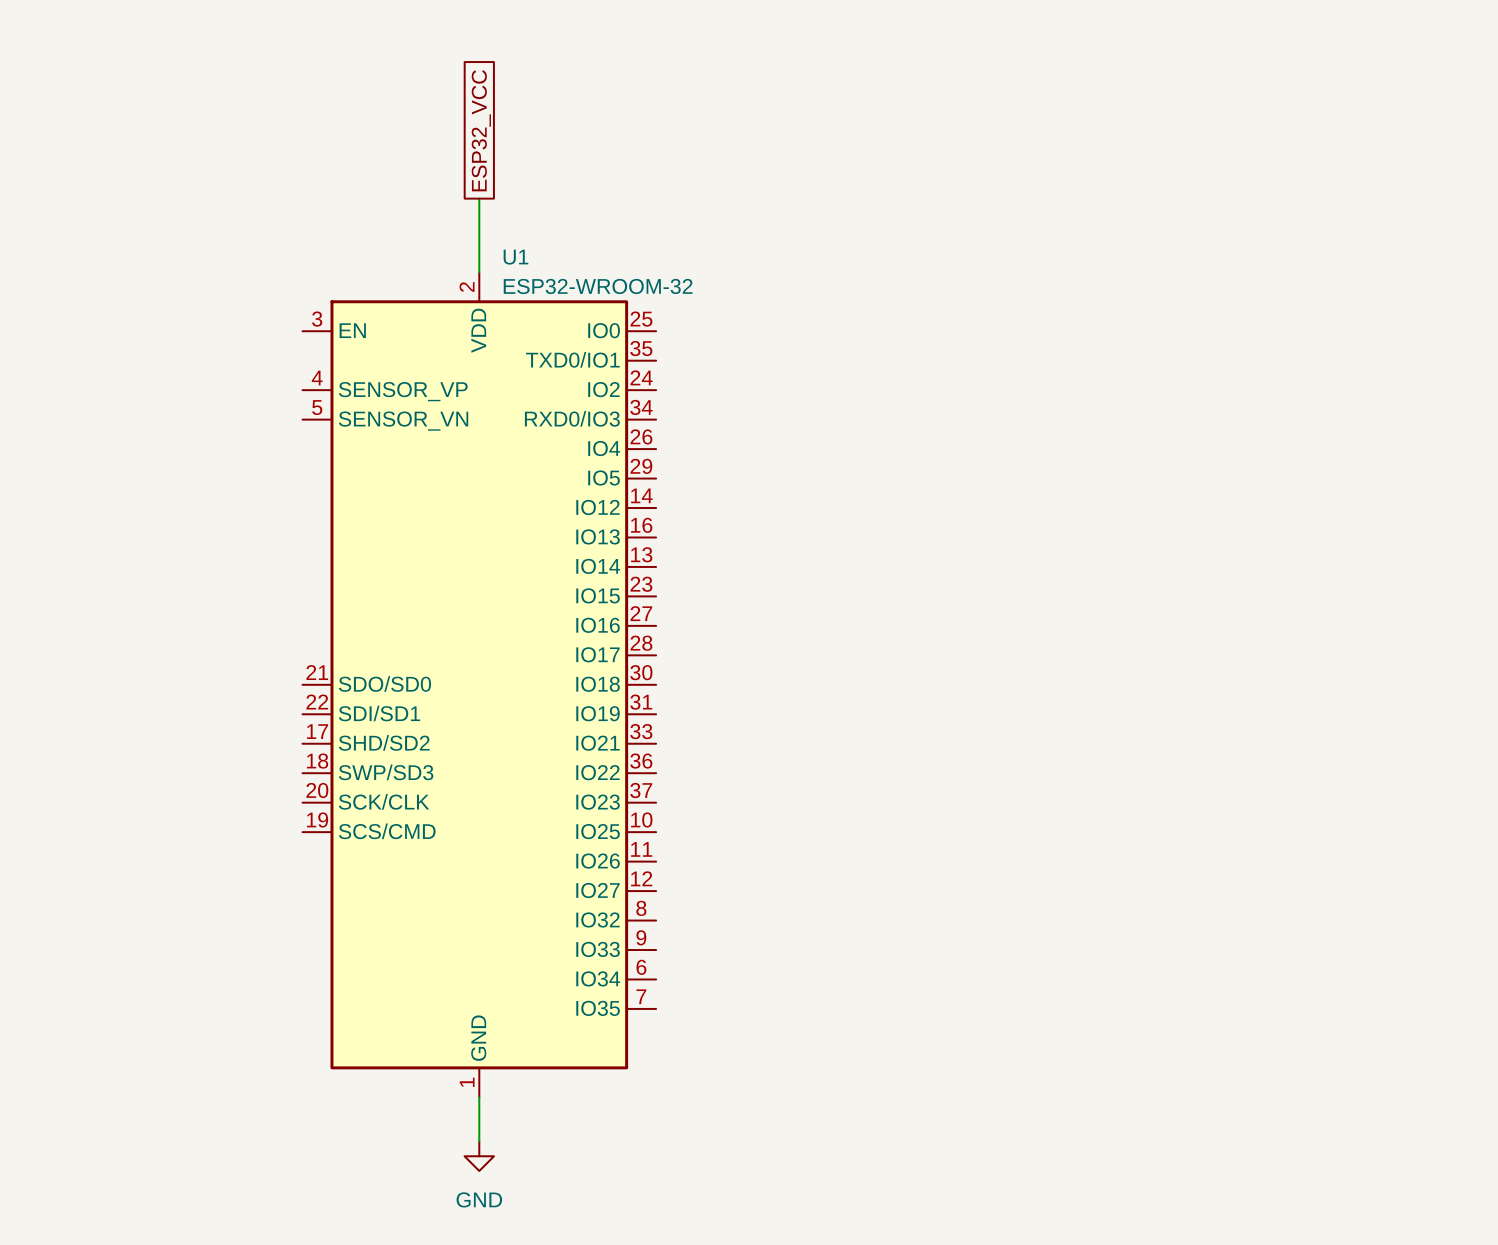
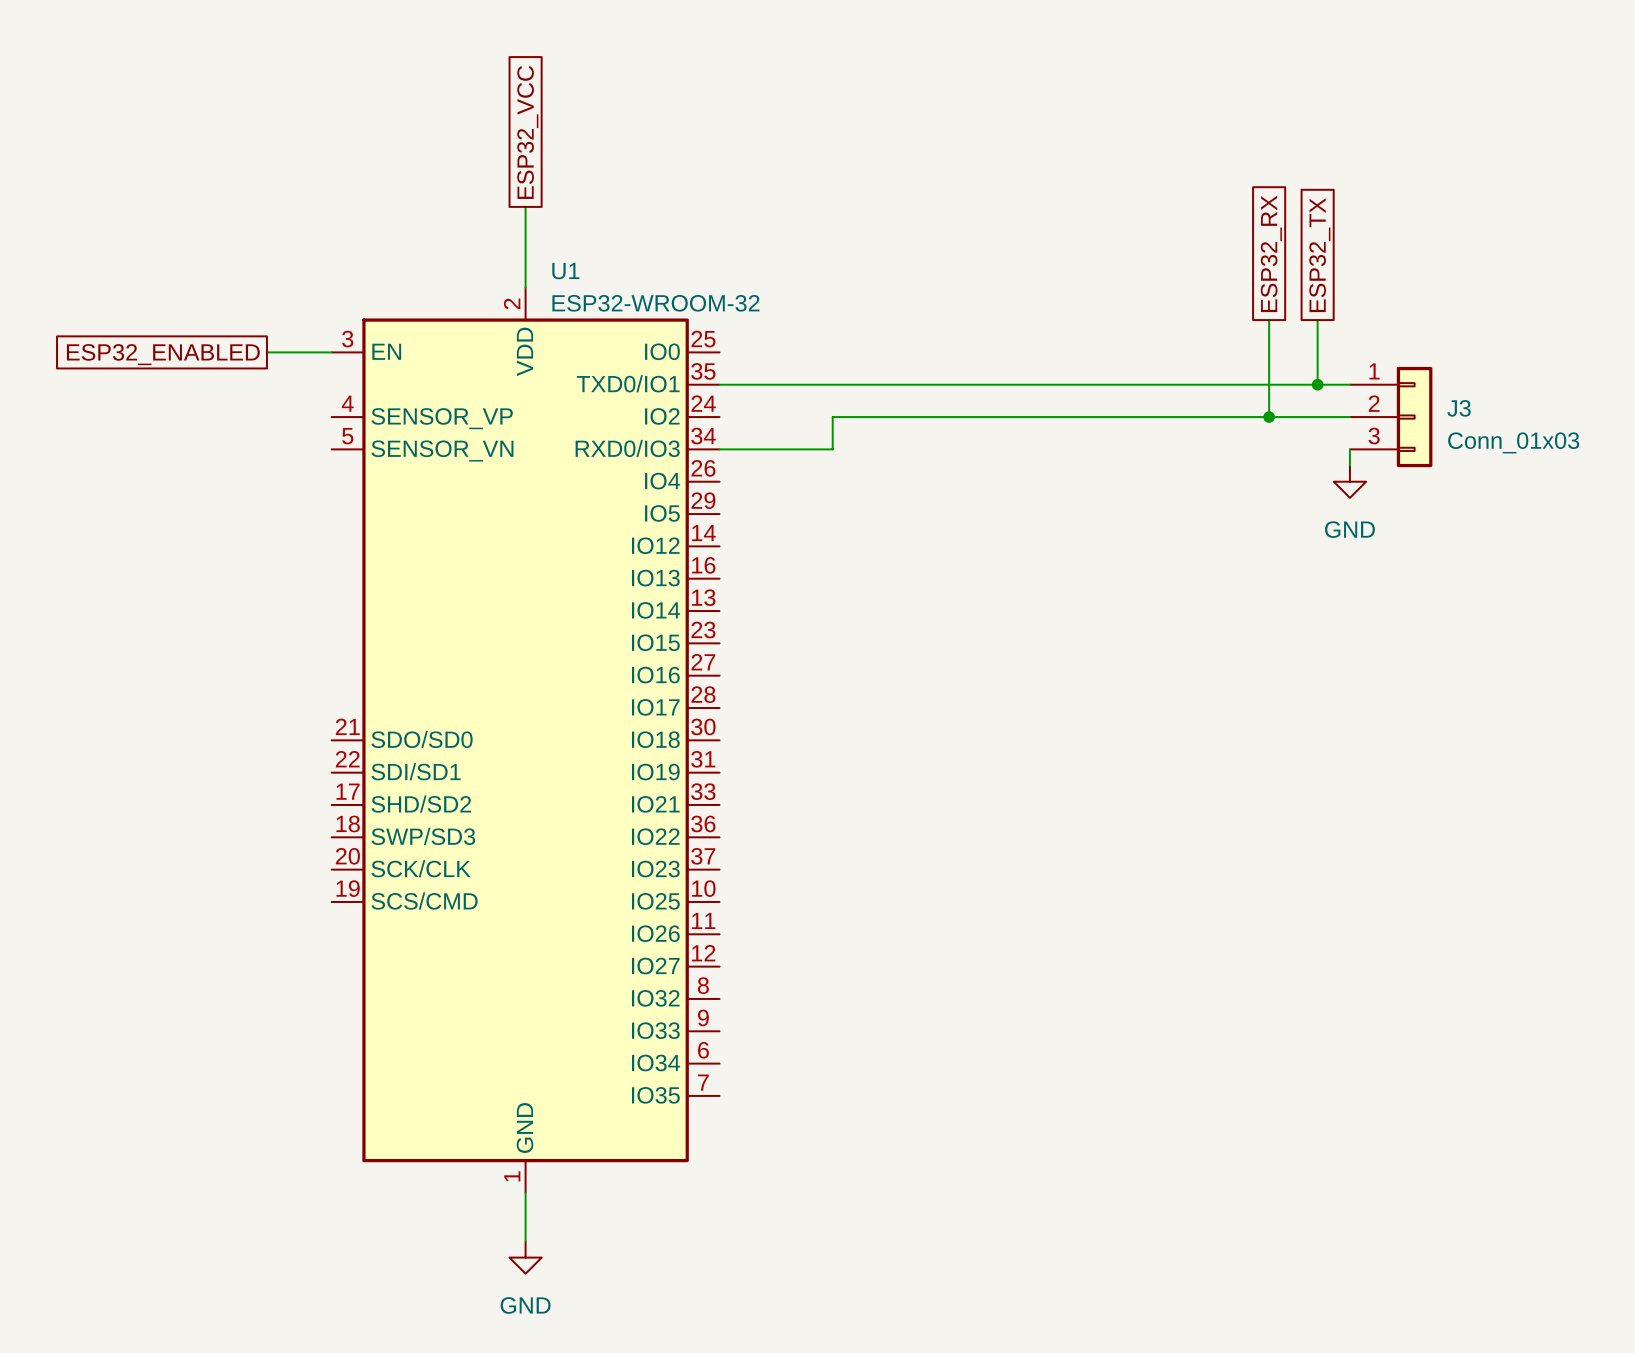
global label: none -> ESP32_RX (1271, 253)
global label: none -> ESP32_TX (1319, 255)
wire: none -> (1269, 320) (1269, 417)
wire: none -> (1317, 320) (1317, 384)
wire: none -> (266, 352) (331, 352)
global label: none -> ESP32_ENABLED (163, 354)
wire: none -> (719, 384) (1349, 384)
junction: none -> (1317, 384)
junction: none -> (1269, 417)
wire: none -> (1349, 417) (832, 417) (832, 449) (719, 449)
J3: none -> Conn_01x03 (1391, 417)
wire: none -> (1349, 449) (1349, 465)
power symbol: none -> GND (1349, 481)

